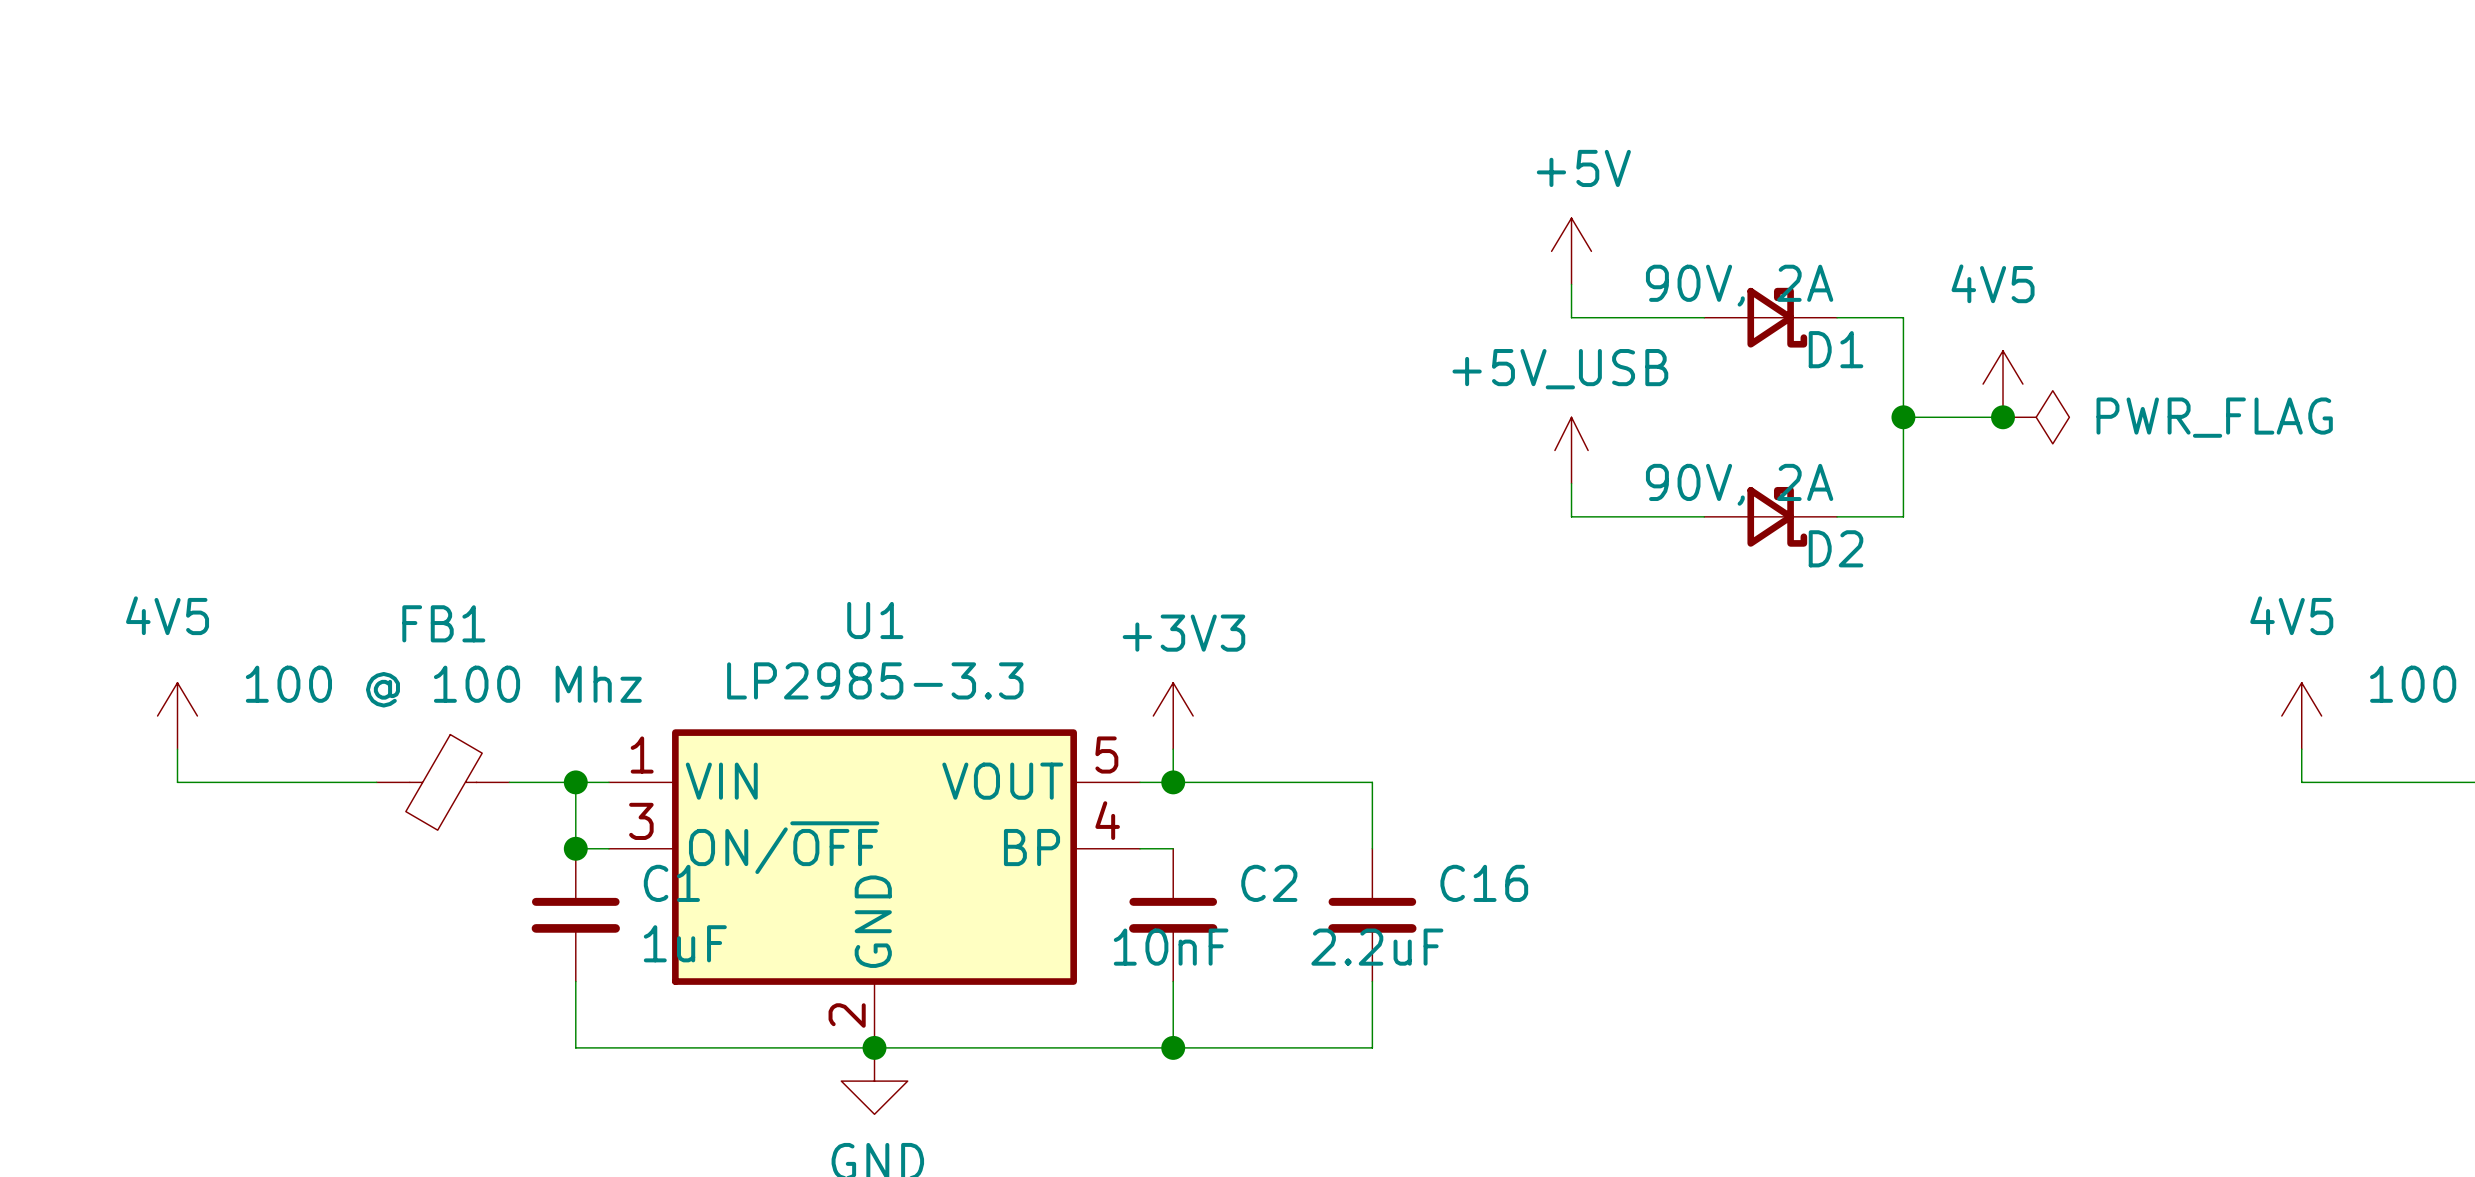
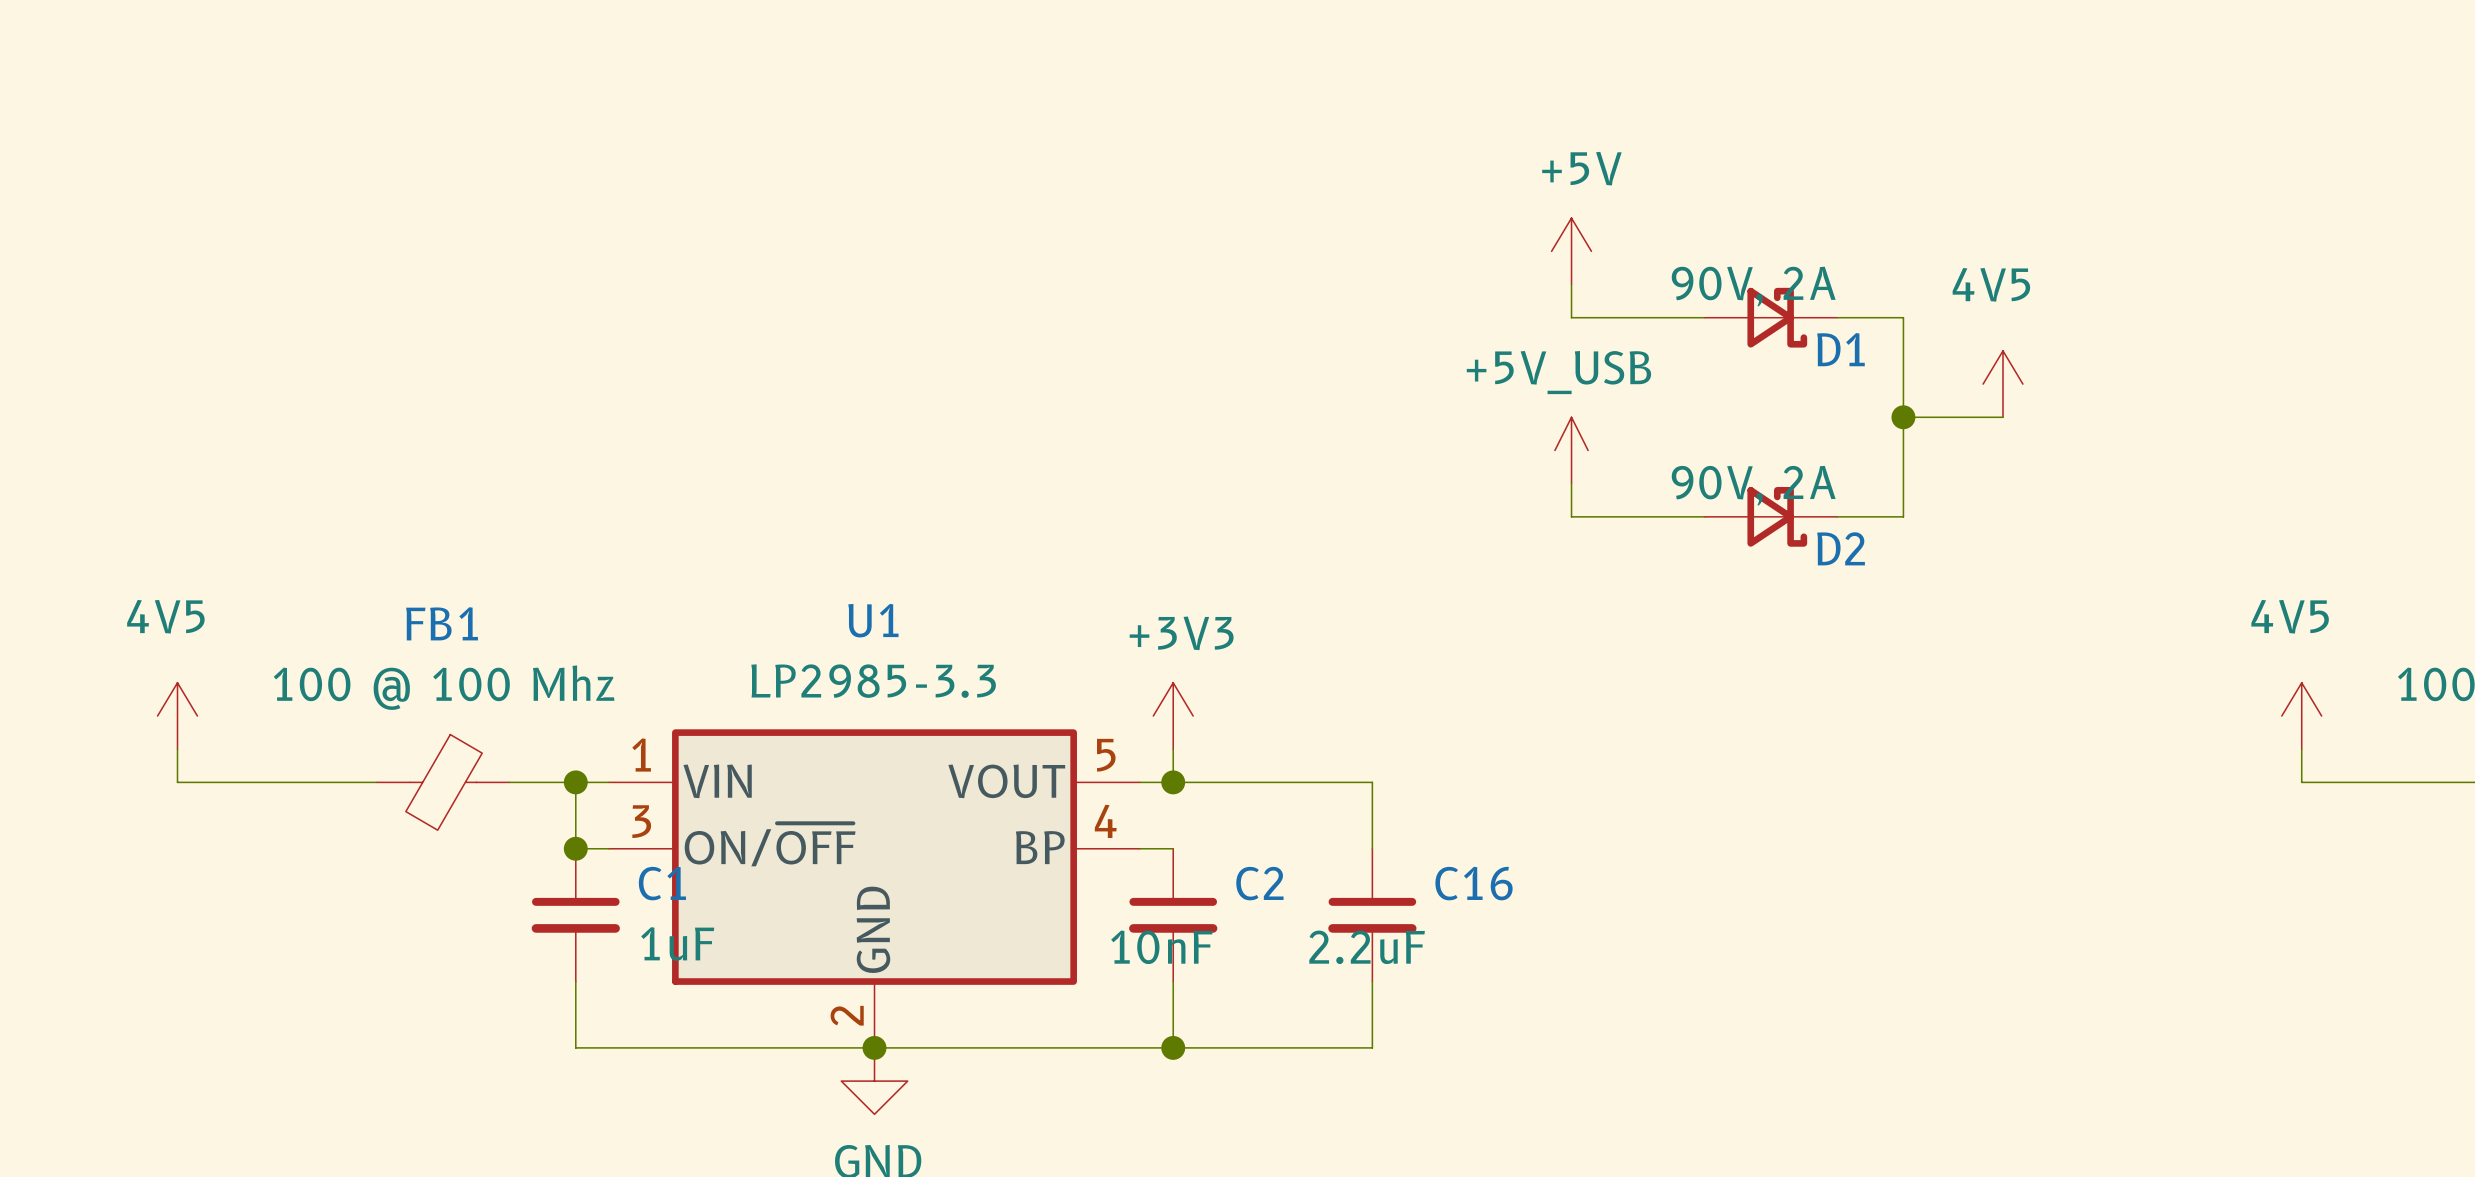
junction: (2003, 417) -> none
power symbol: PWR_FLAG (2036, 417) -> none

